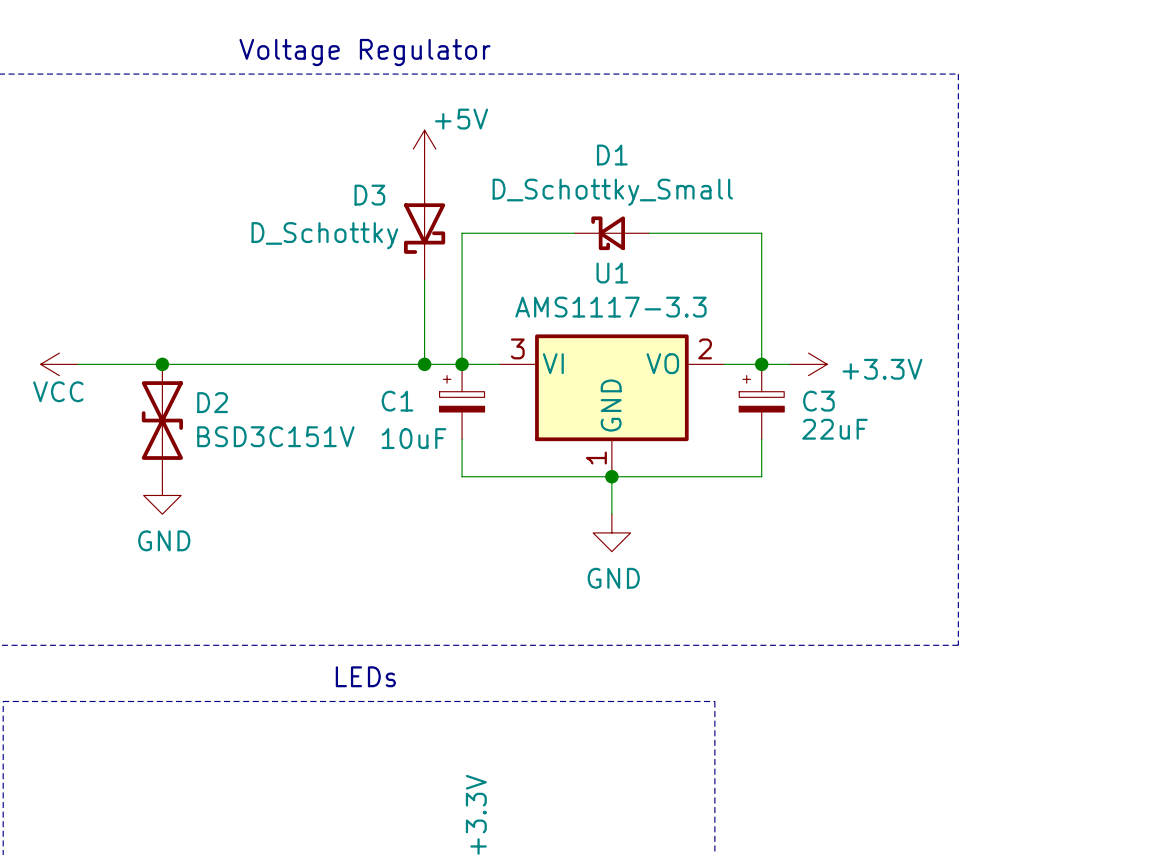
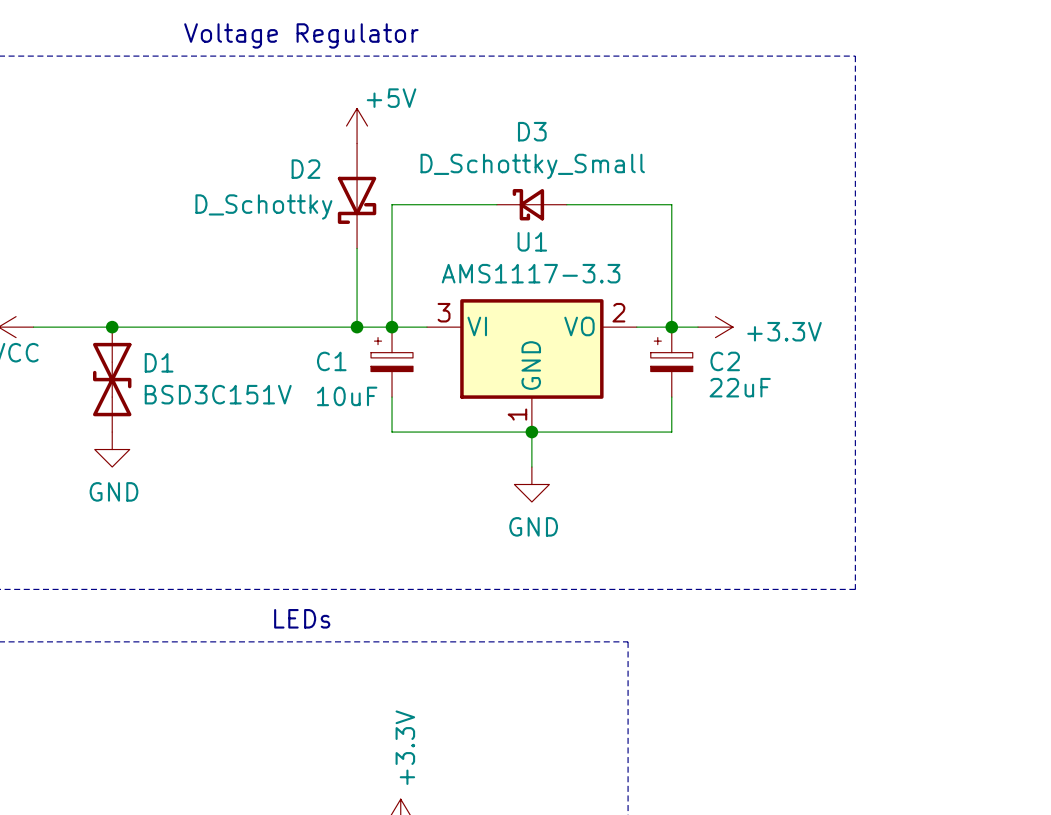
D1 name: D1 (612, 155) -> D3 (532, 131)
D3 name: D3 (369, 195) -> D2 (305, 169)
C3 name: C3 (818, 401) -> C2 (725, 361)
D2 name: D2 (212, 402) -> D1 (159, 362)

